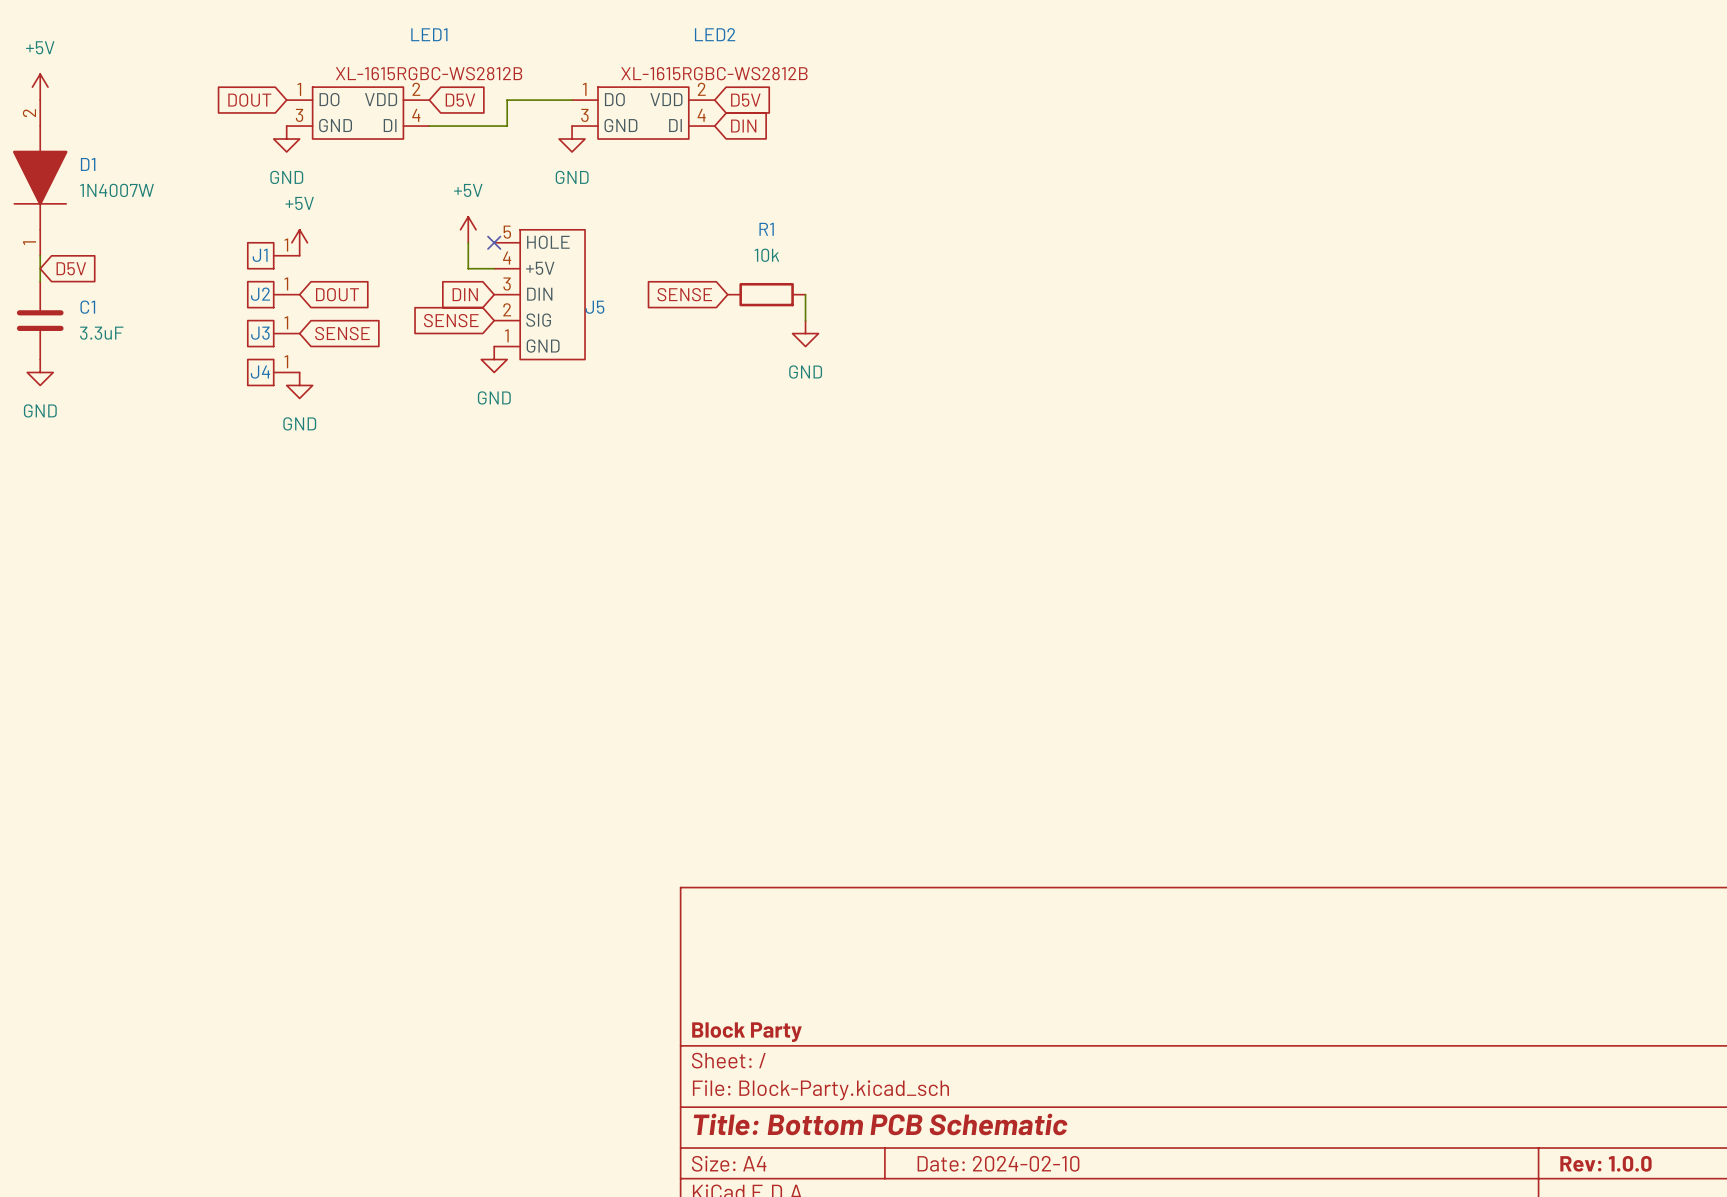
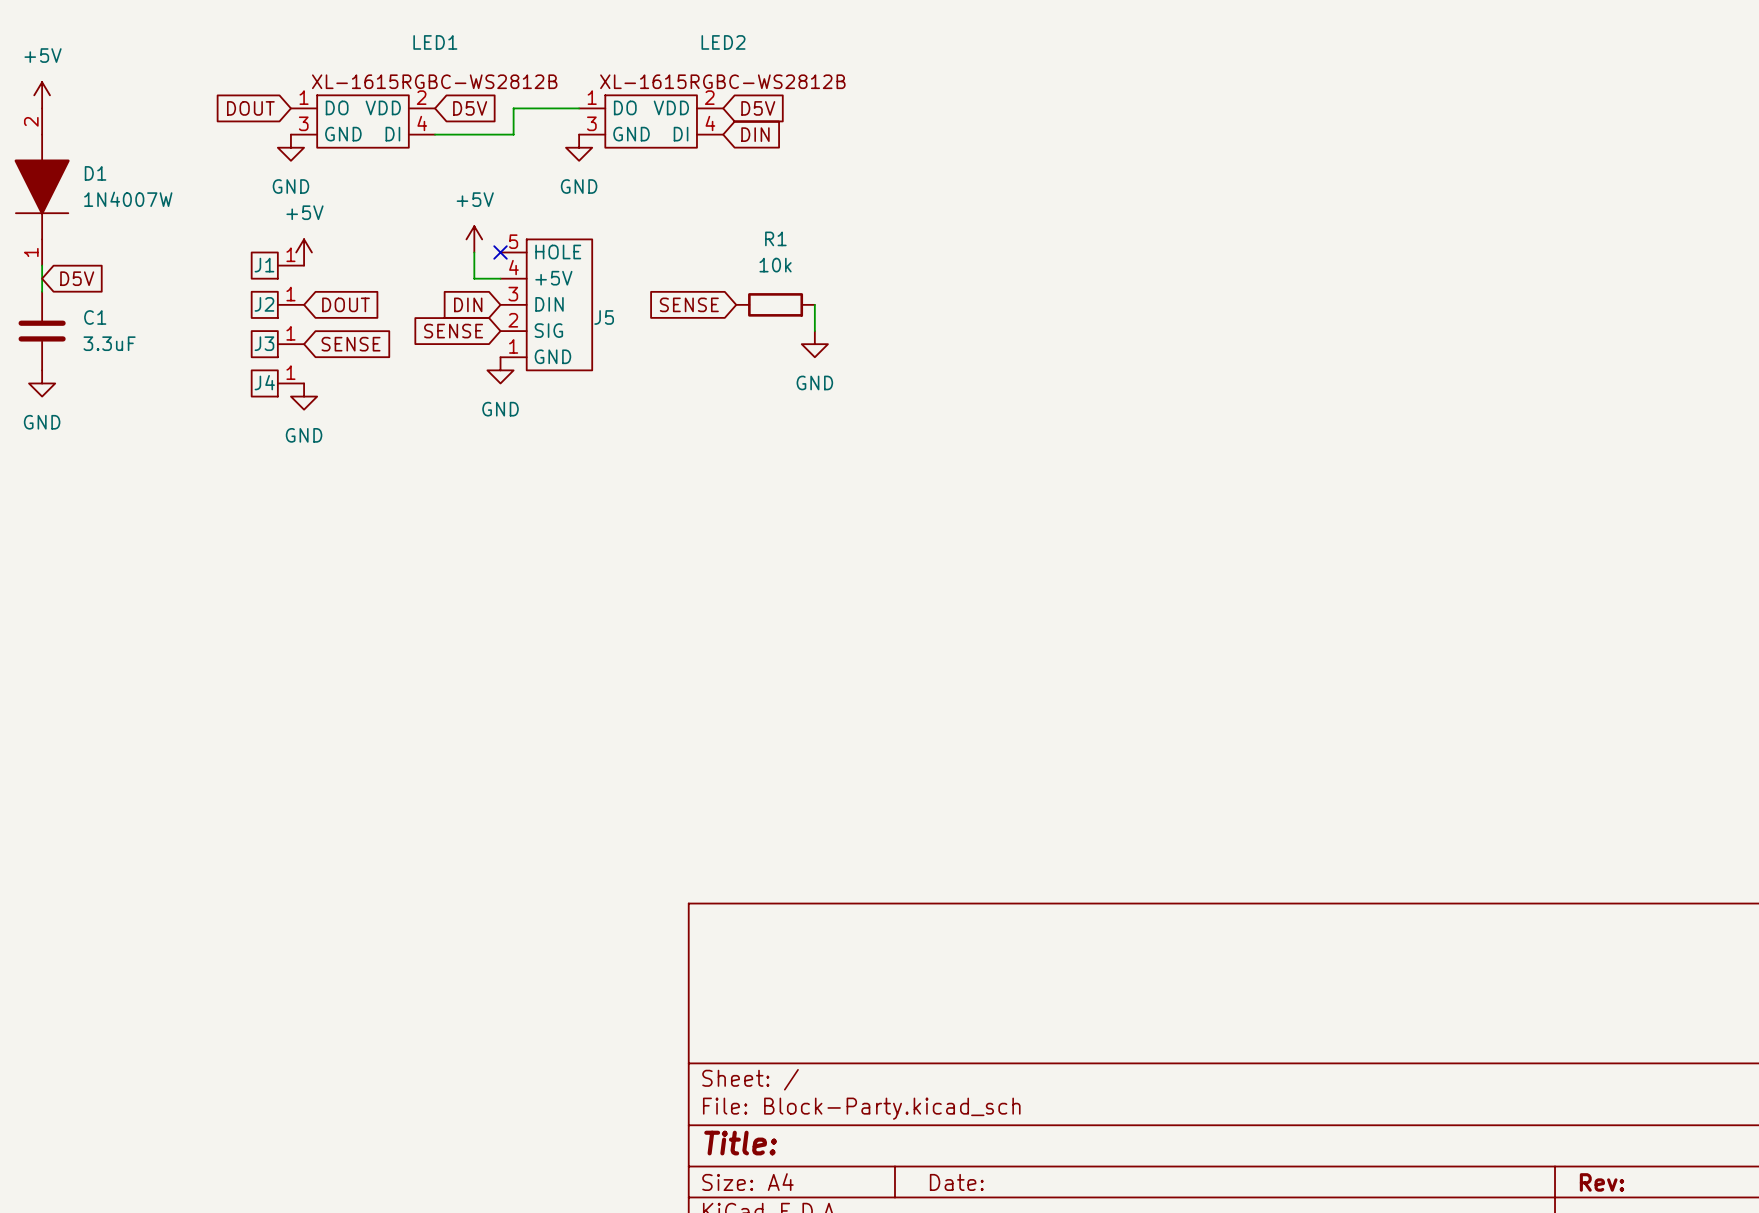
title block: Block Party (746, 1032) -> none
title block: Title: Bottom PCB Schematic (880, 1124) -> Title: (740, 1143)
title block: Date: 2024-02-10 (998, 1163) -> Date: (956, 1182)
title block: Rev: 1.0.0 (1605, 1163) -> Rev: (1601, 1182)

